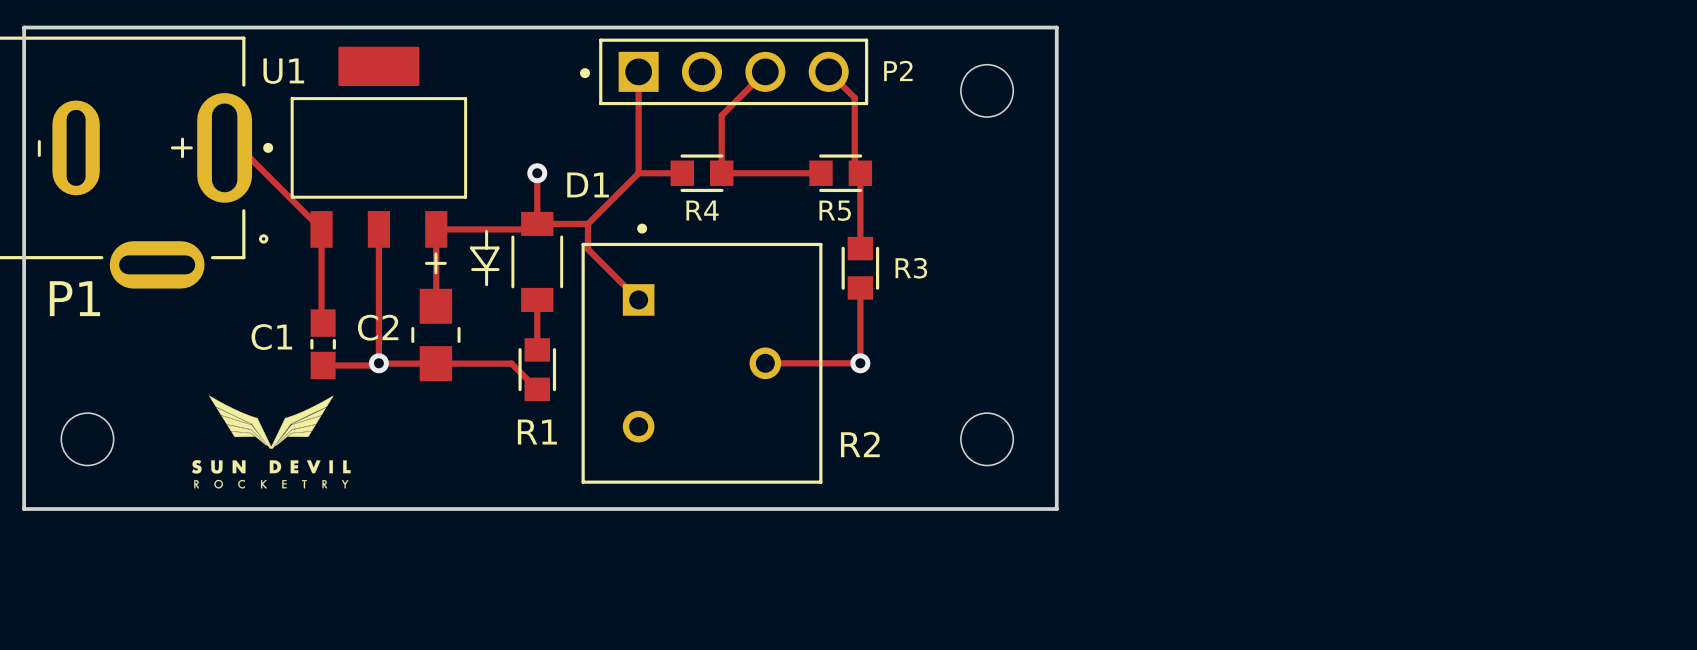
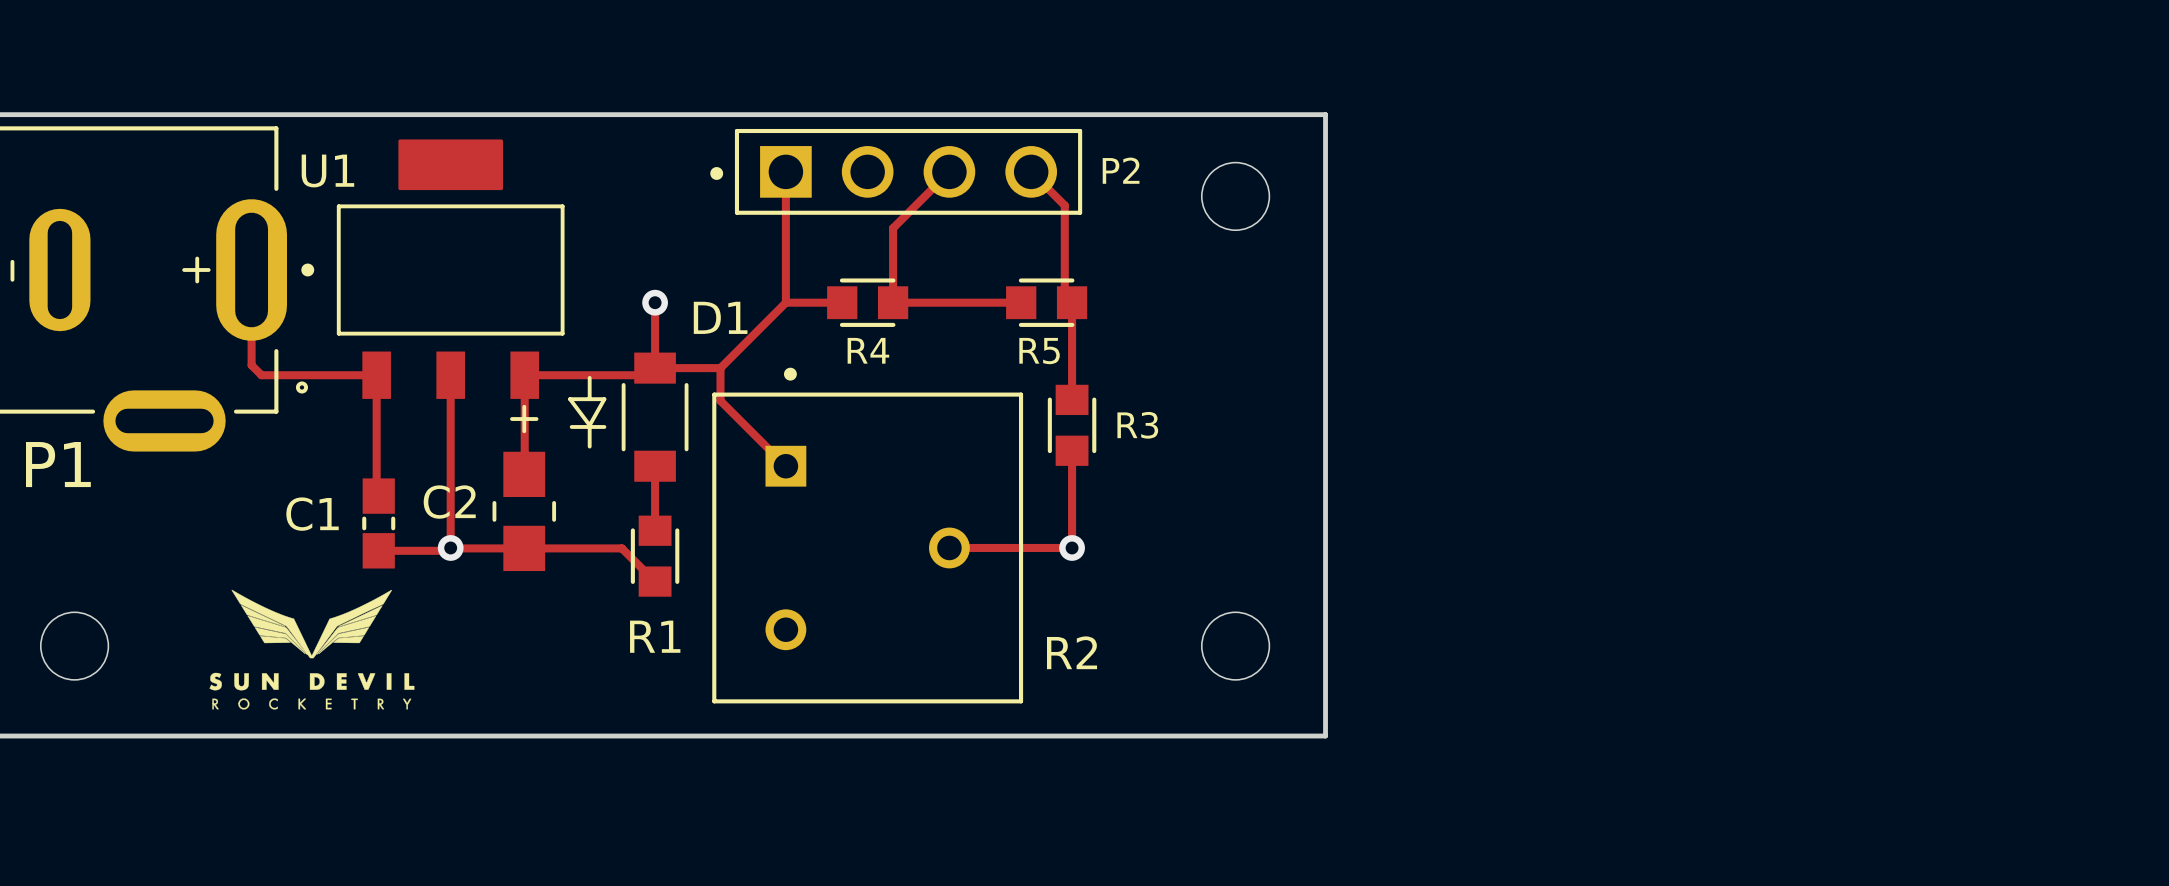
track: (239, 147) (321, 229) -> (251, 291) (251, 365) (261, 375) (376, 375)

